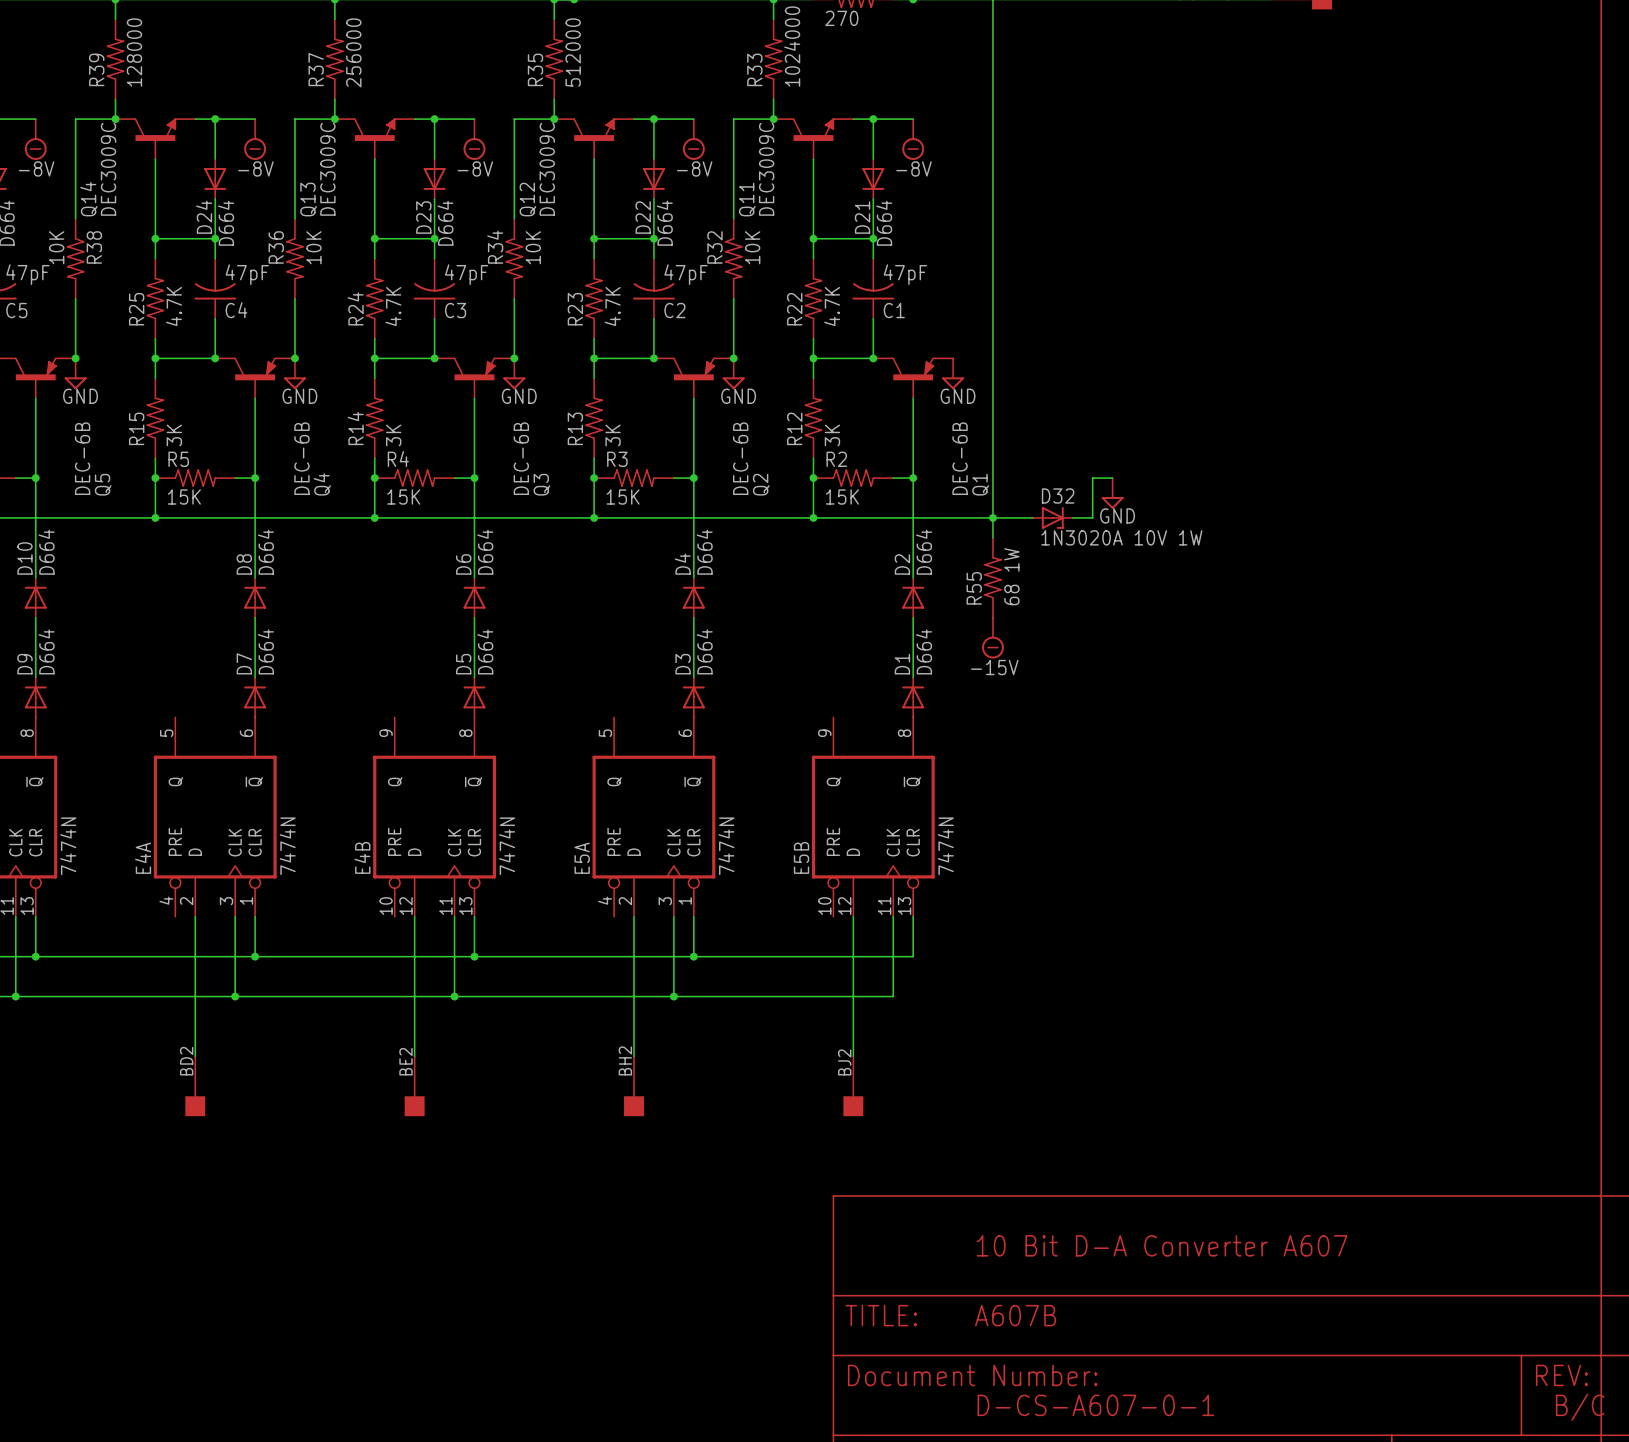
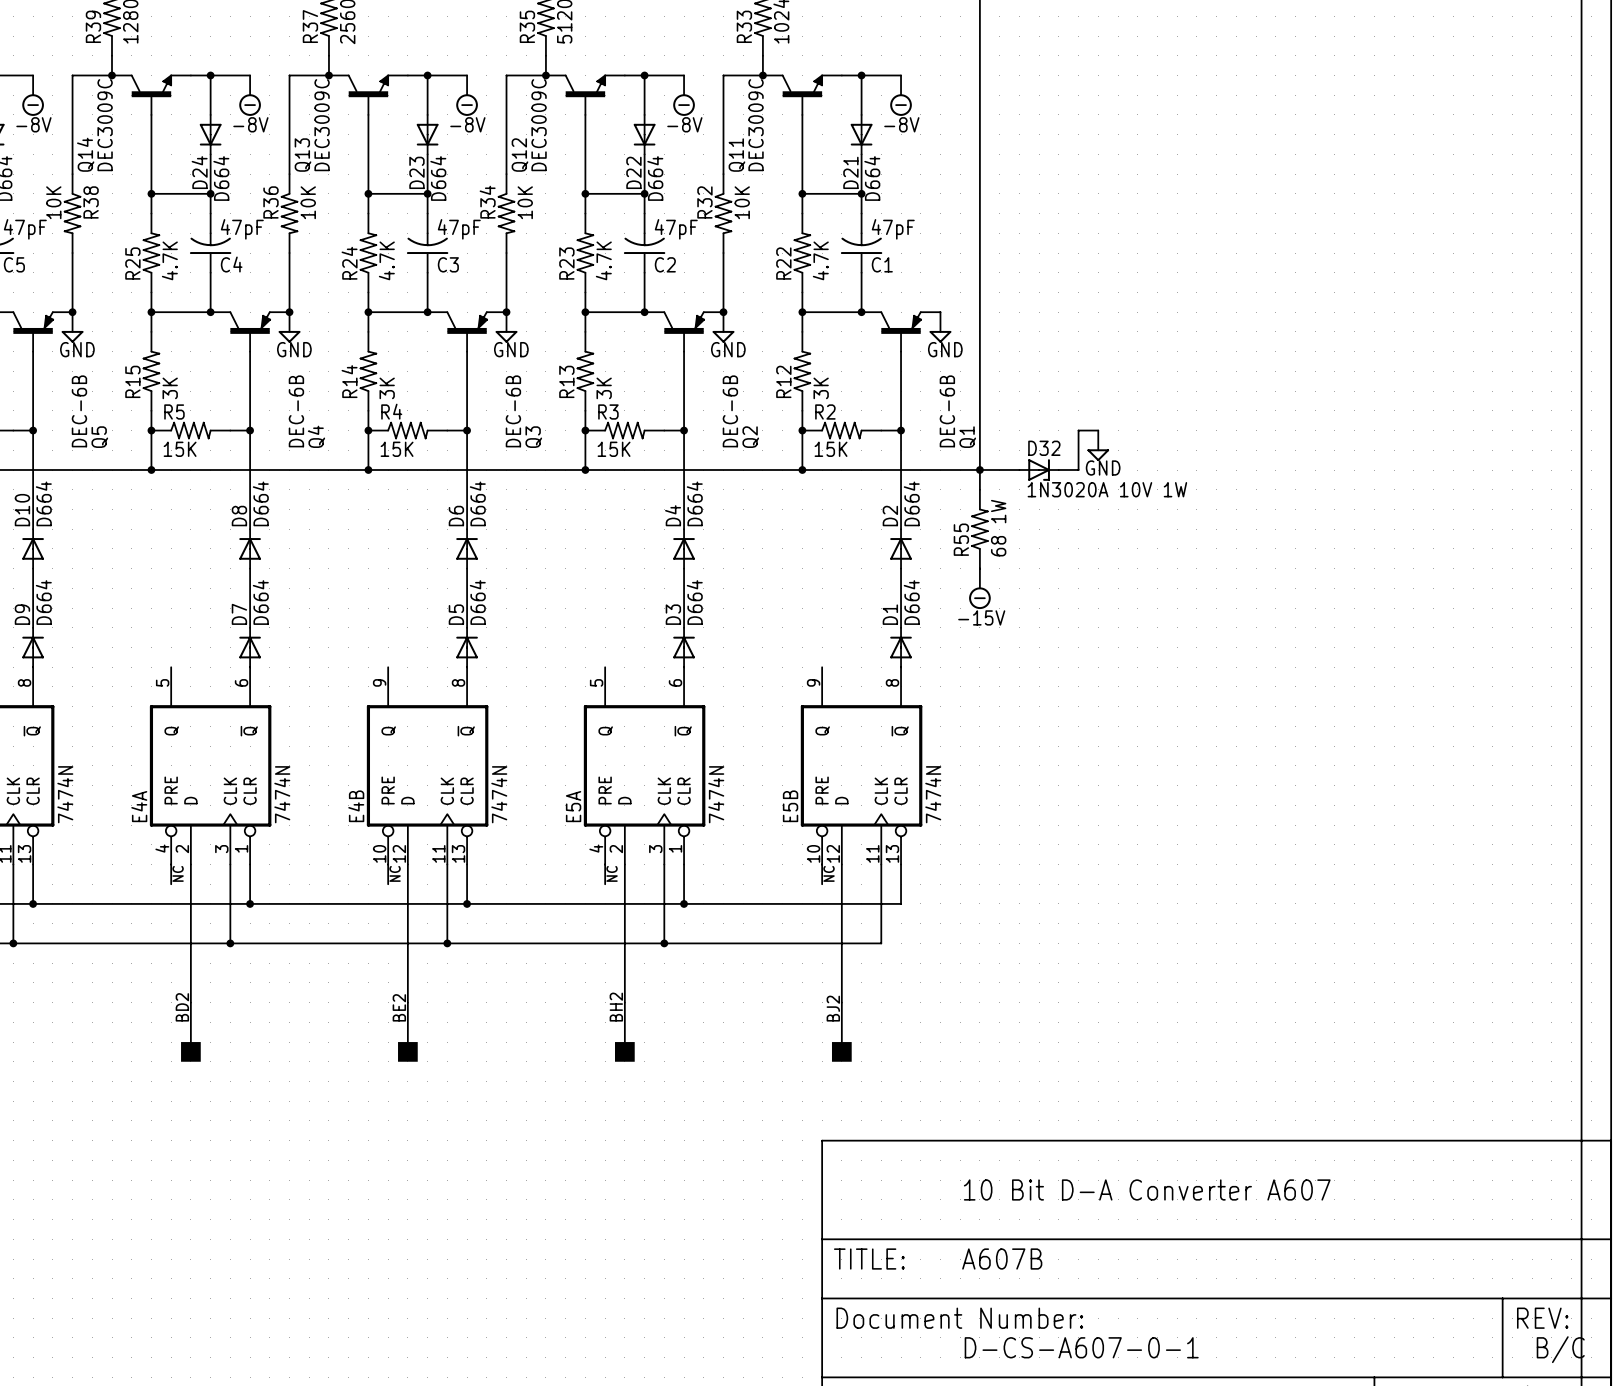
power symbol: none -> (171, 874)
power symbol: none -> (388, 874)
power symbol: none -> (605, 874)
power symbol: none -> (822, 874)

